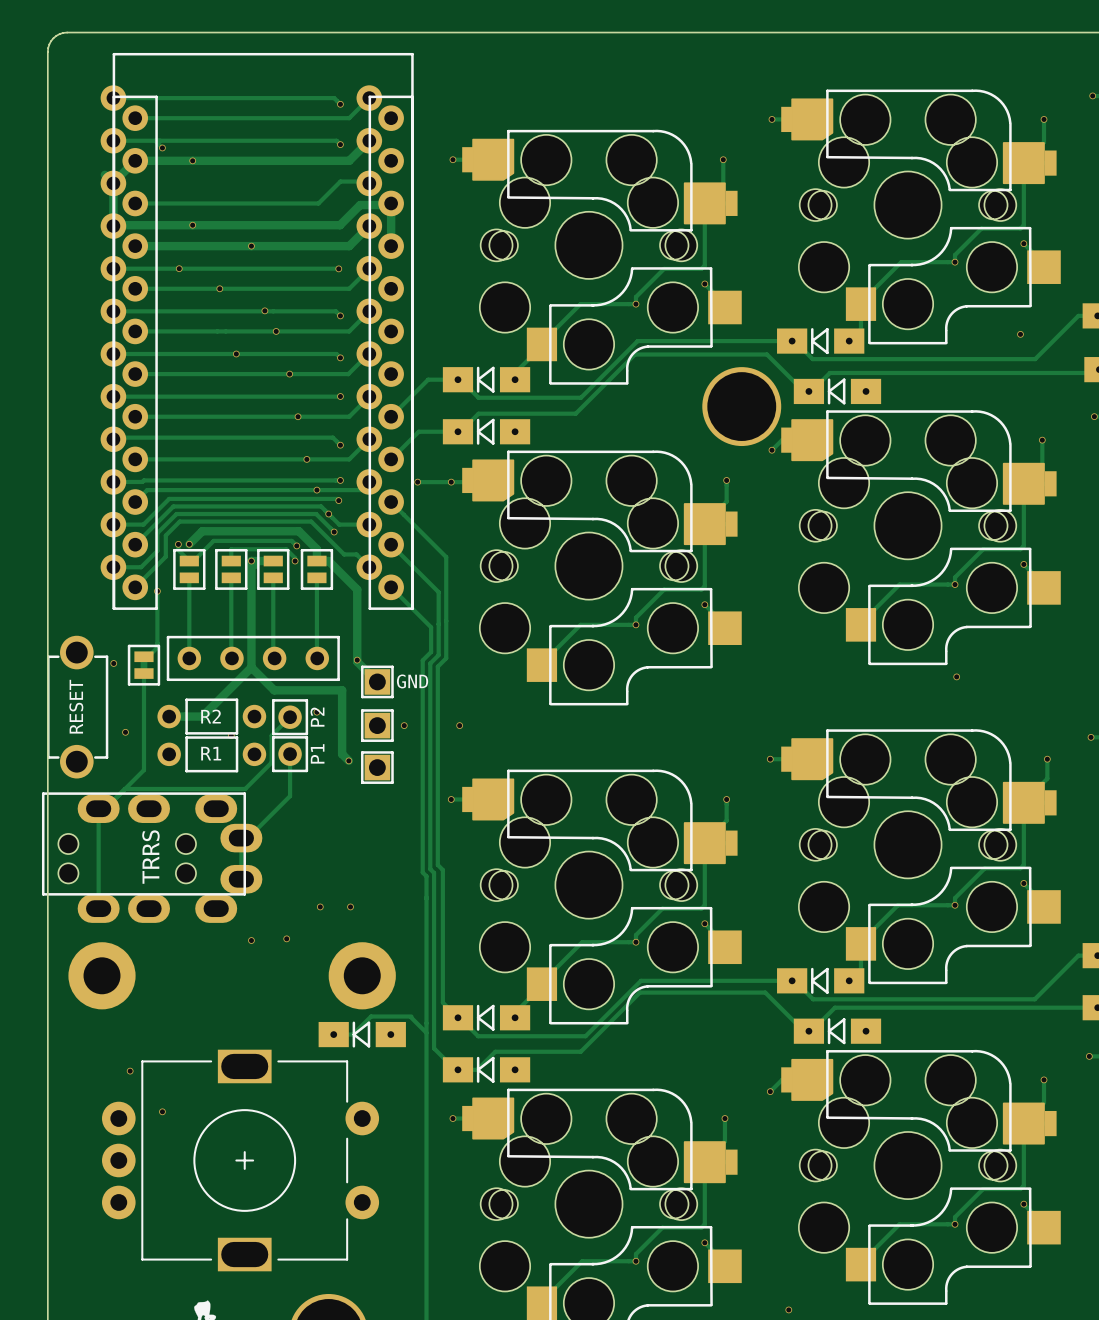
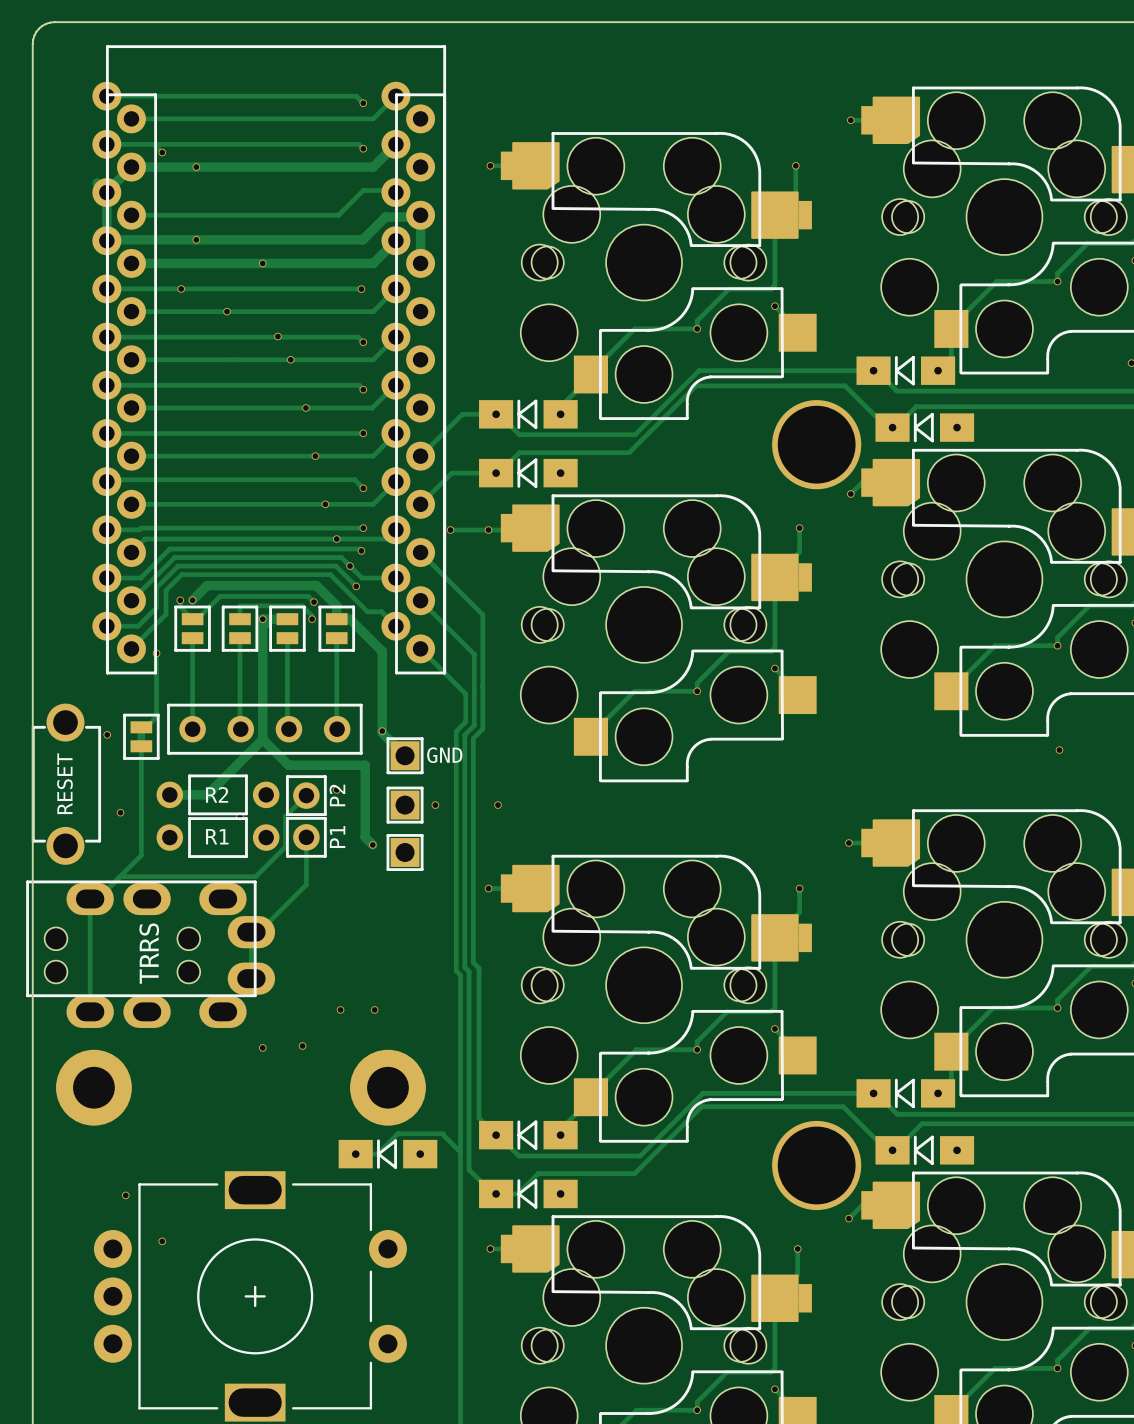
via: (236, 354) -> none
part: none -> (816, 1165)

